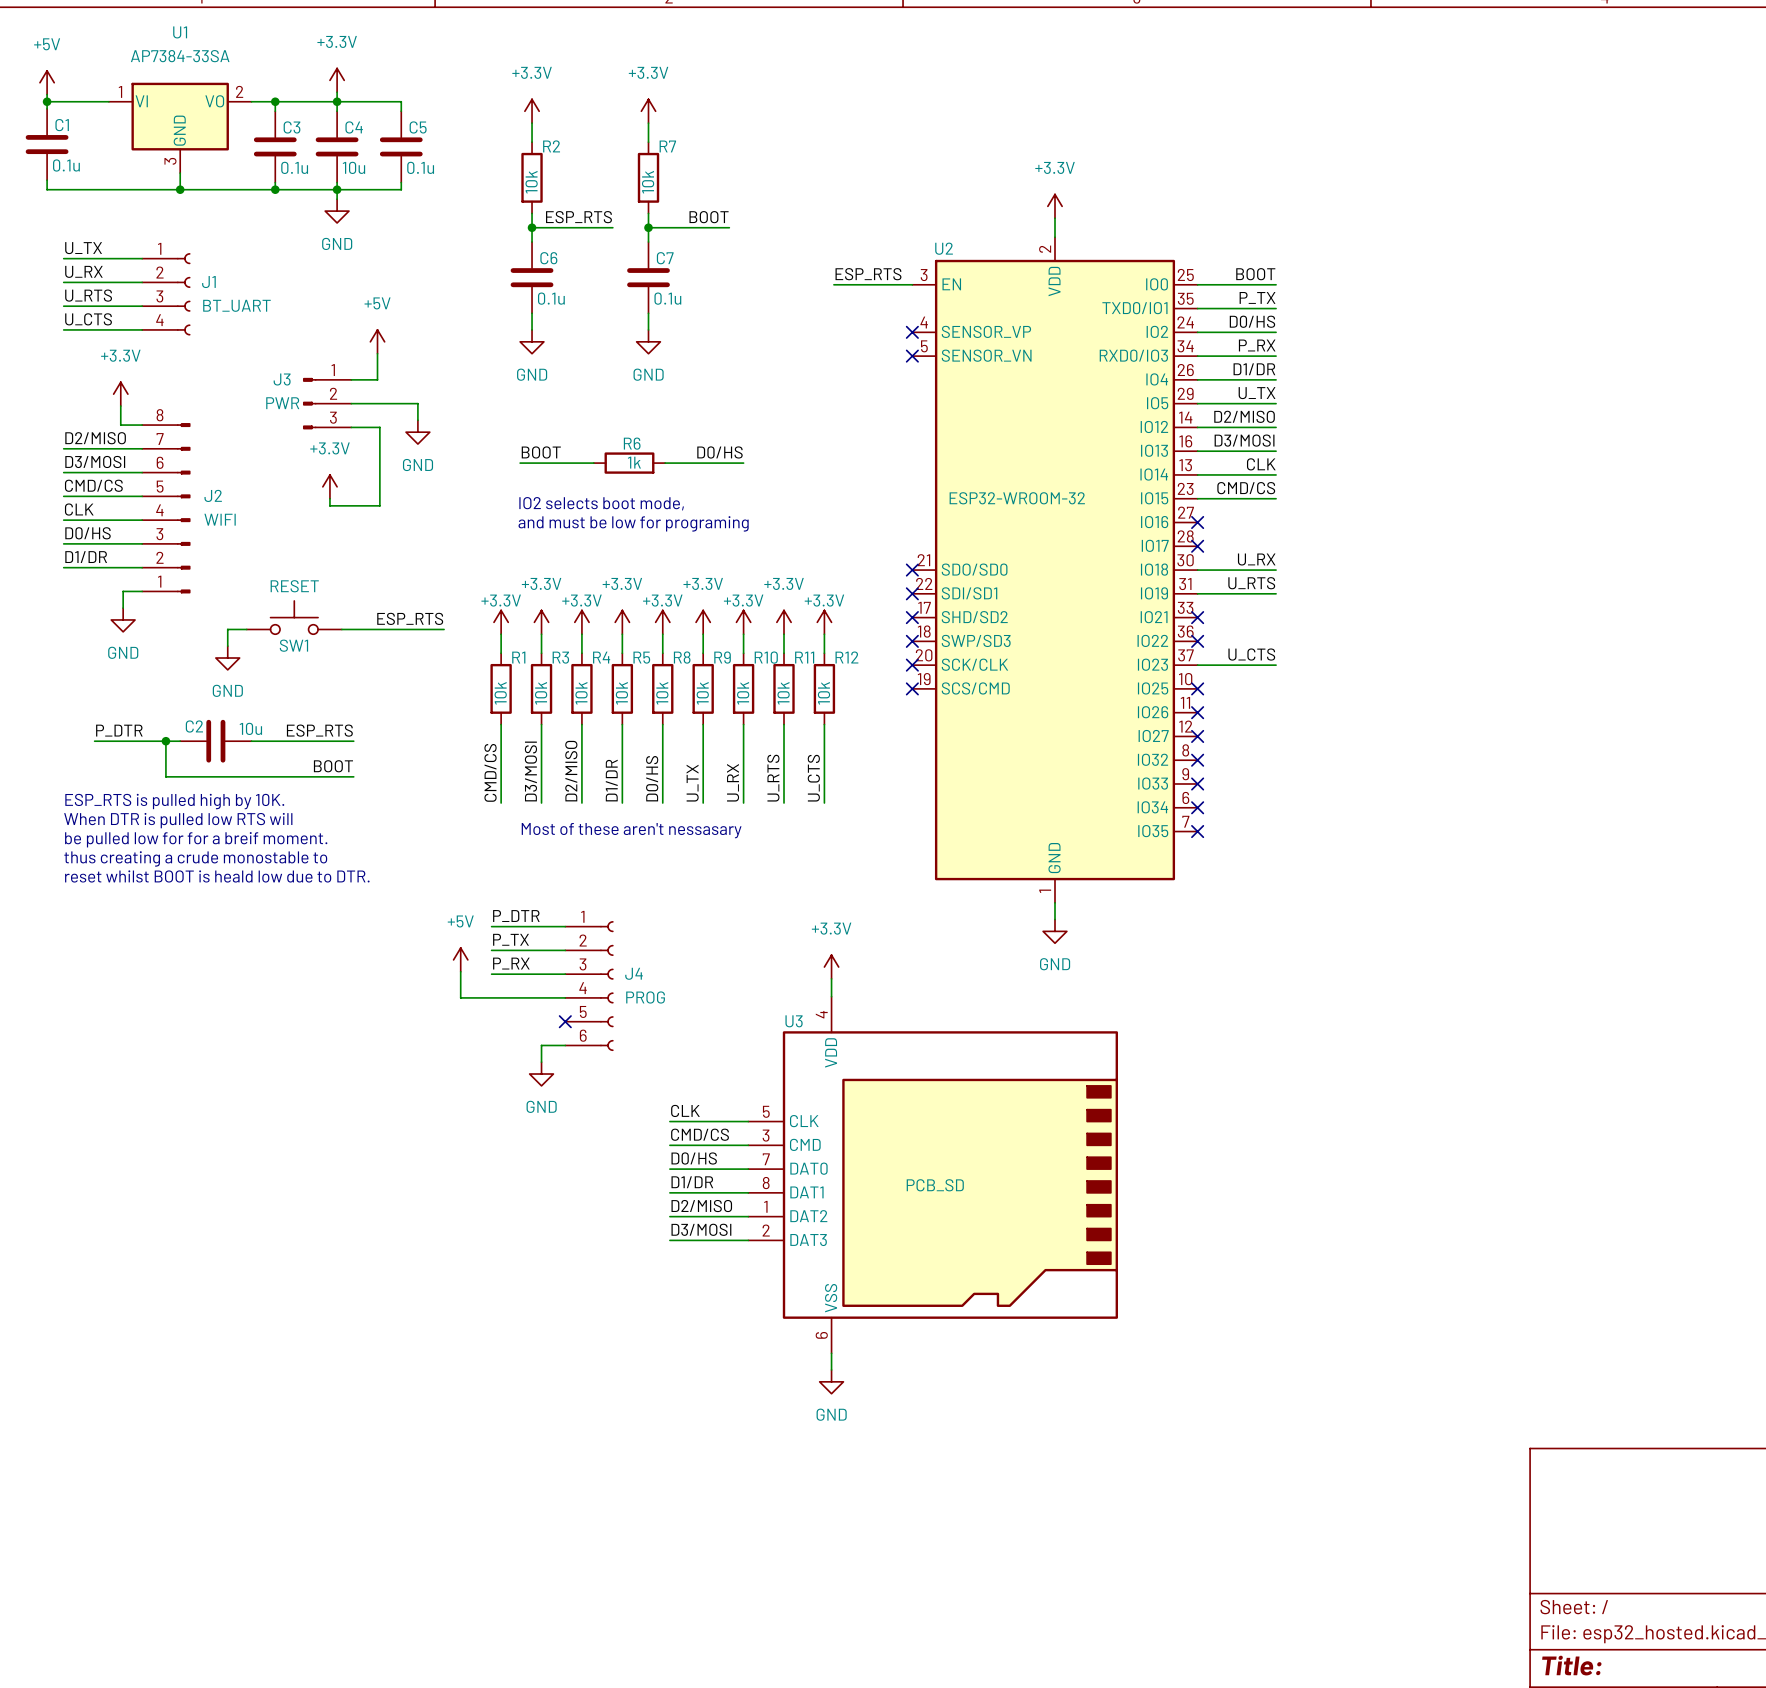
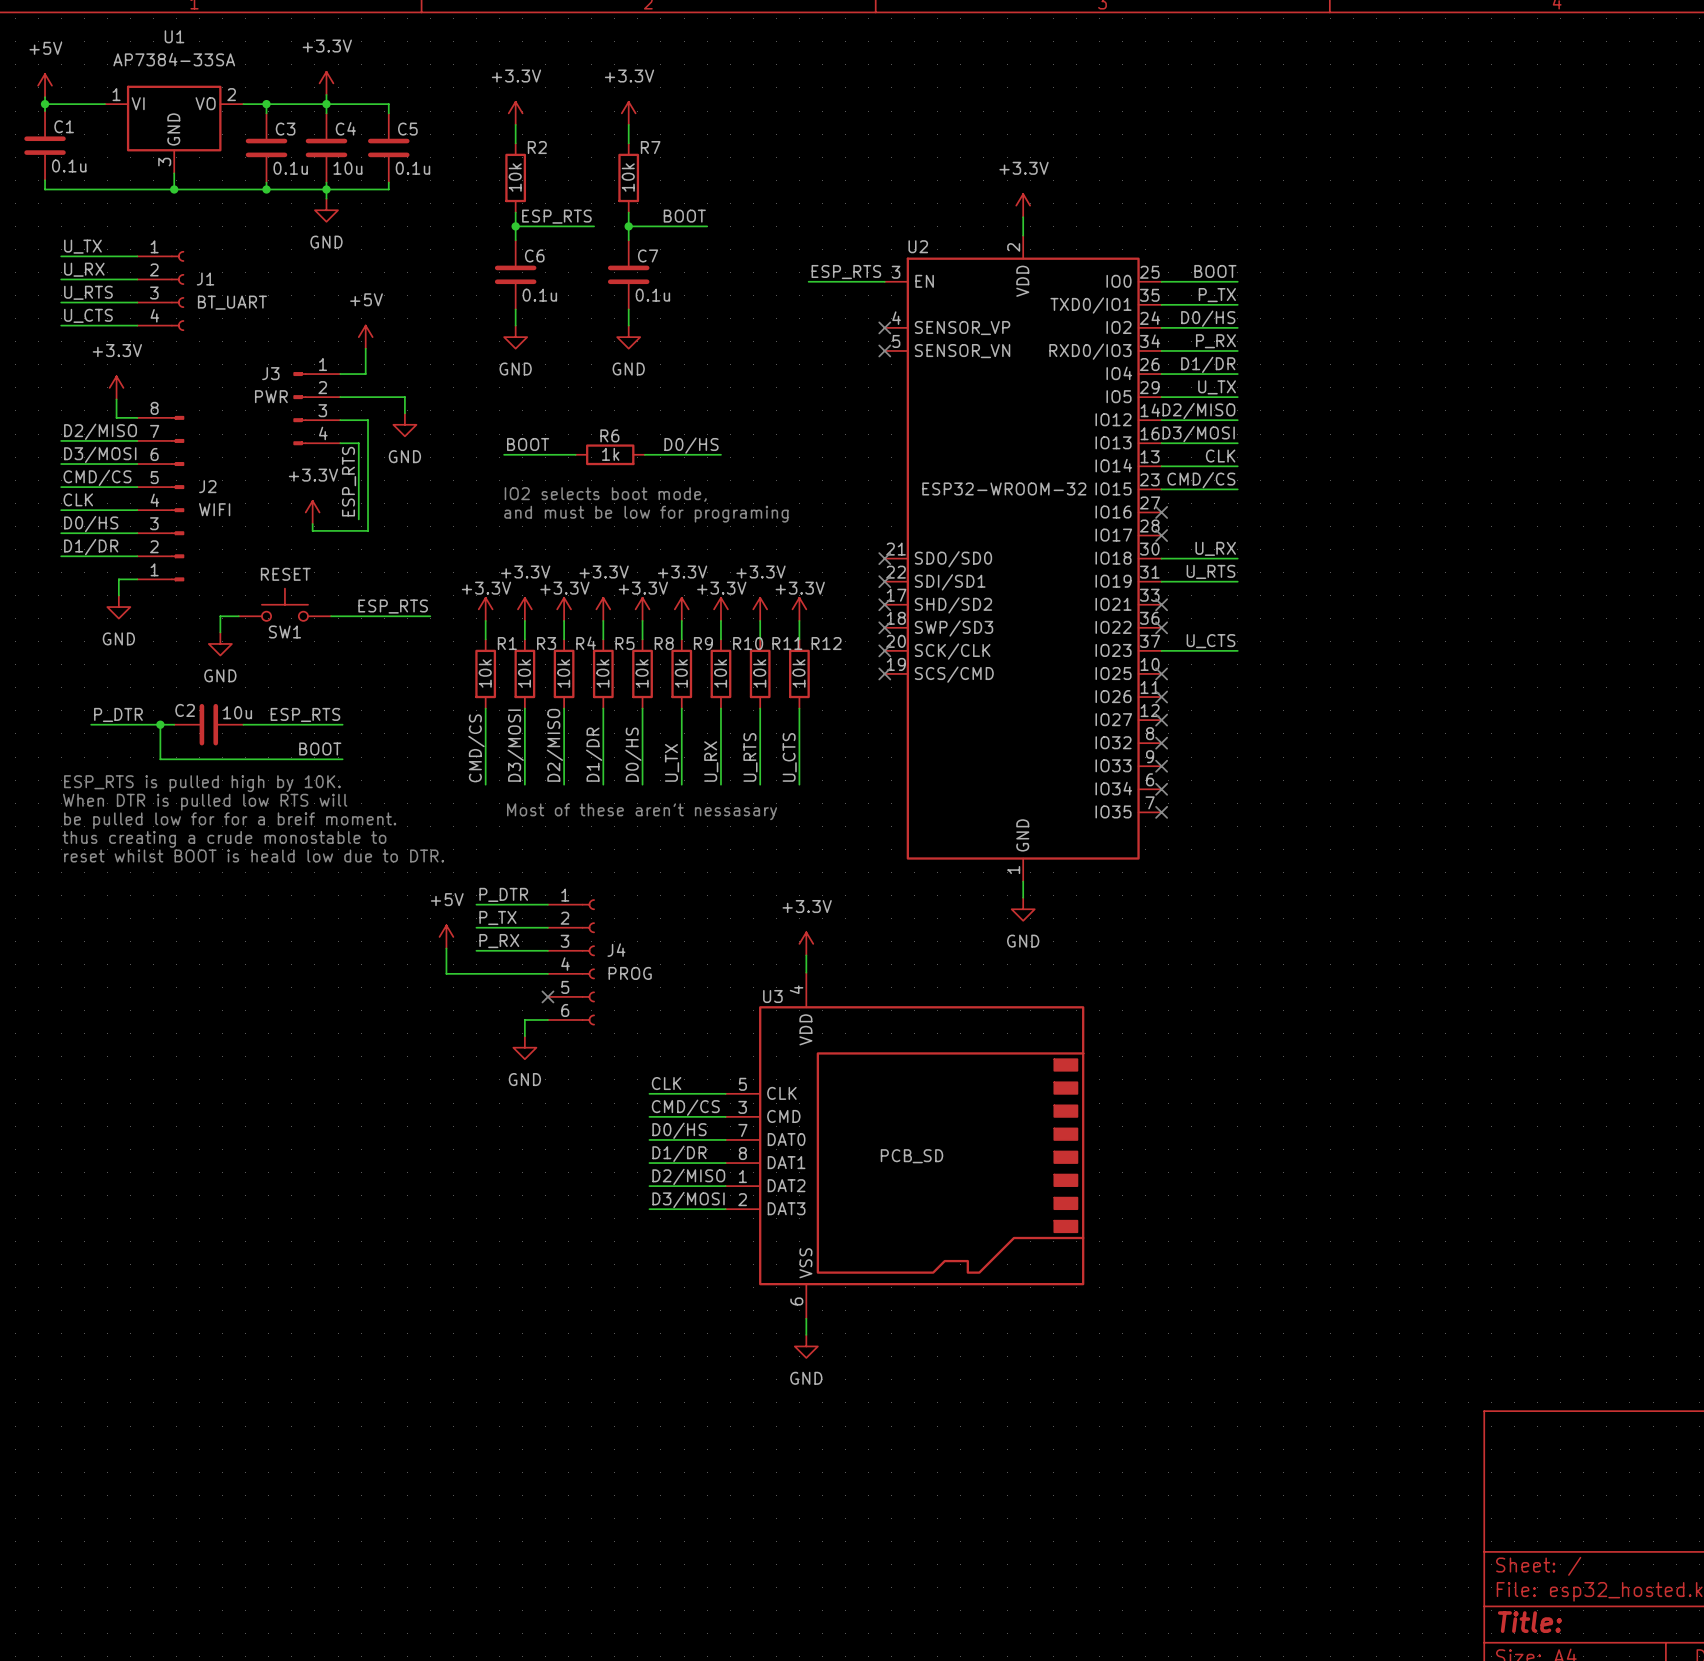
J3 symbol: [303, 377, 352, 430] -> [293, 372, 341, 446]
wire: none -> (340, 443) (358, 443) (358, 519)
power symbol position: +3.3V (329, 486) -> +3.3V (312, 512)
label: none -> ESP_RTS (349, 481)
wire: (329, 498) (329, 505) (379, 505) -> (312, 524) (312, 530) (368, 530) (368, 496)

